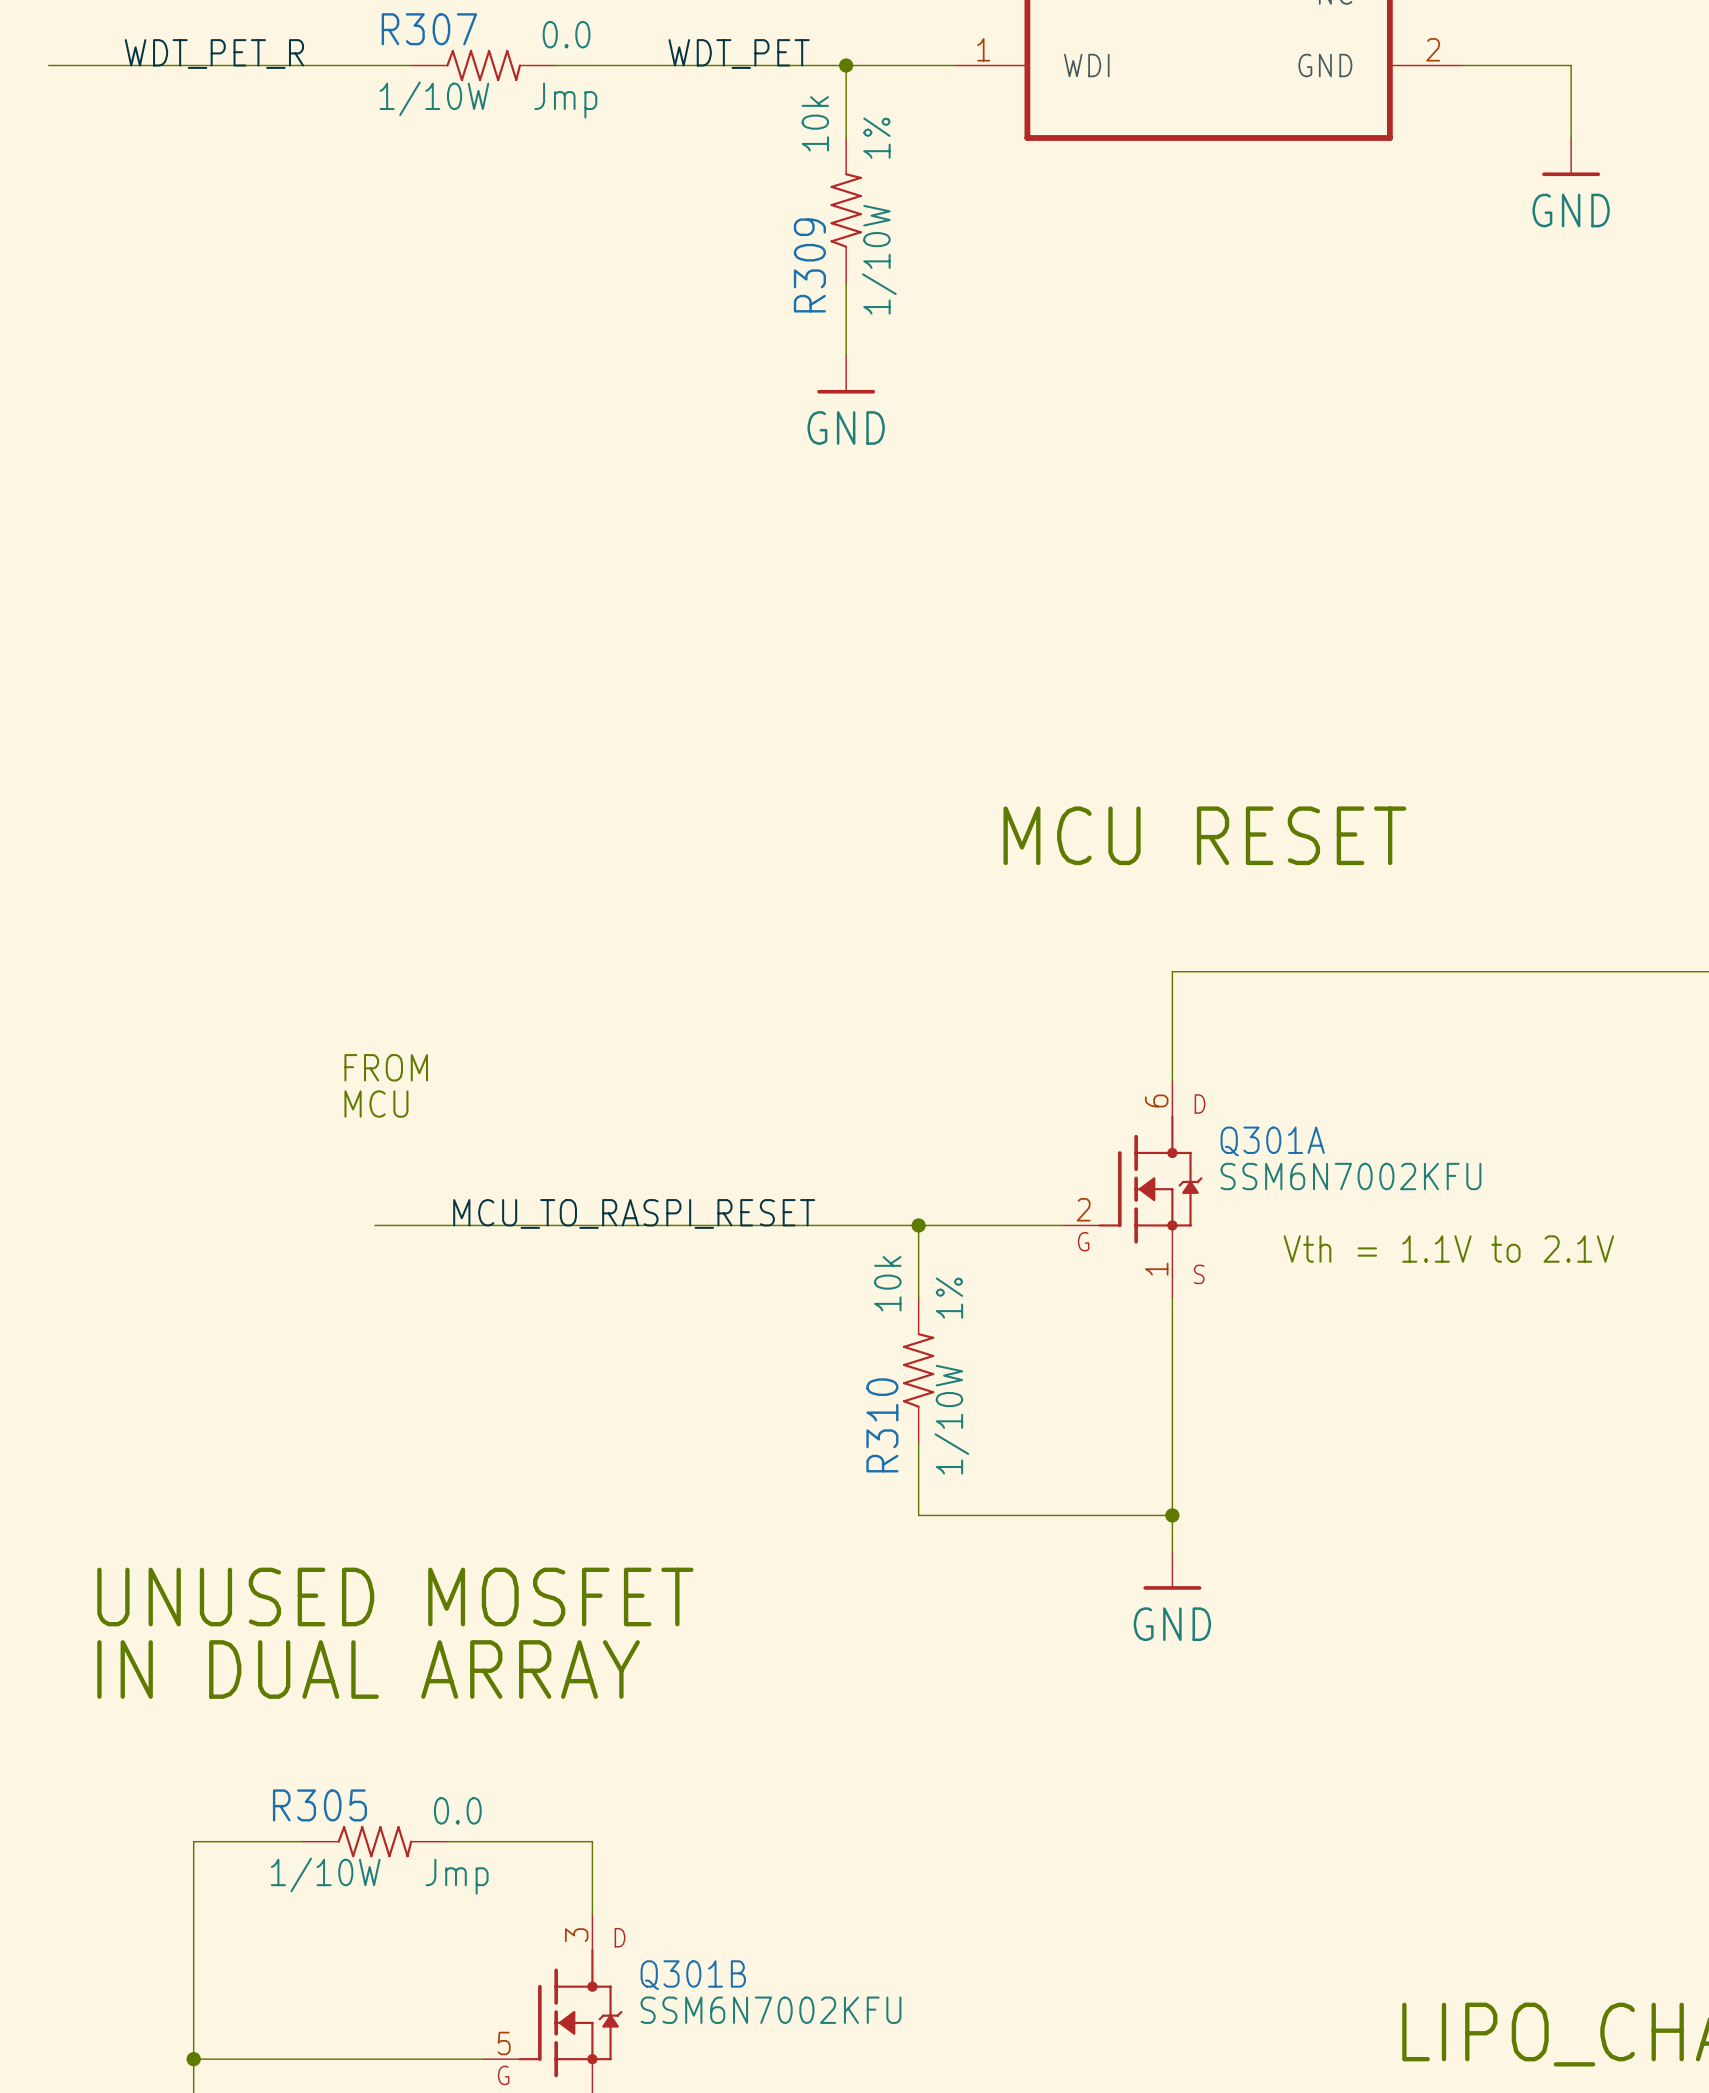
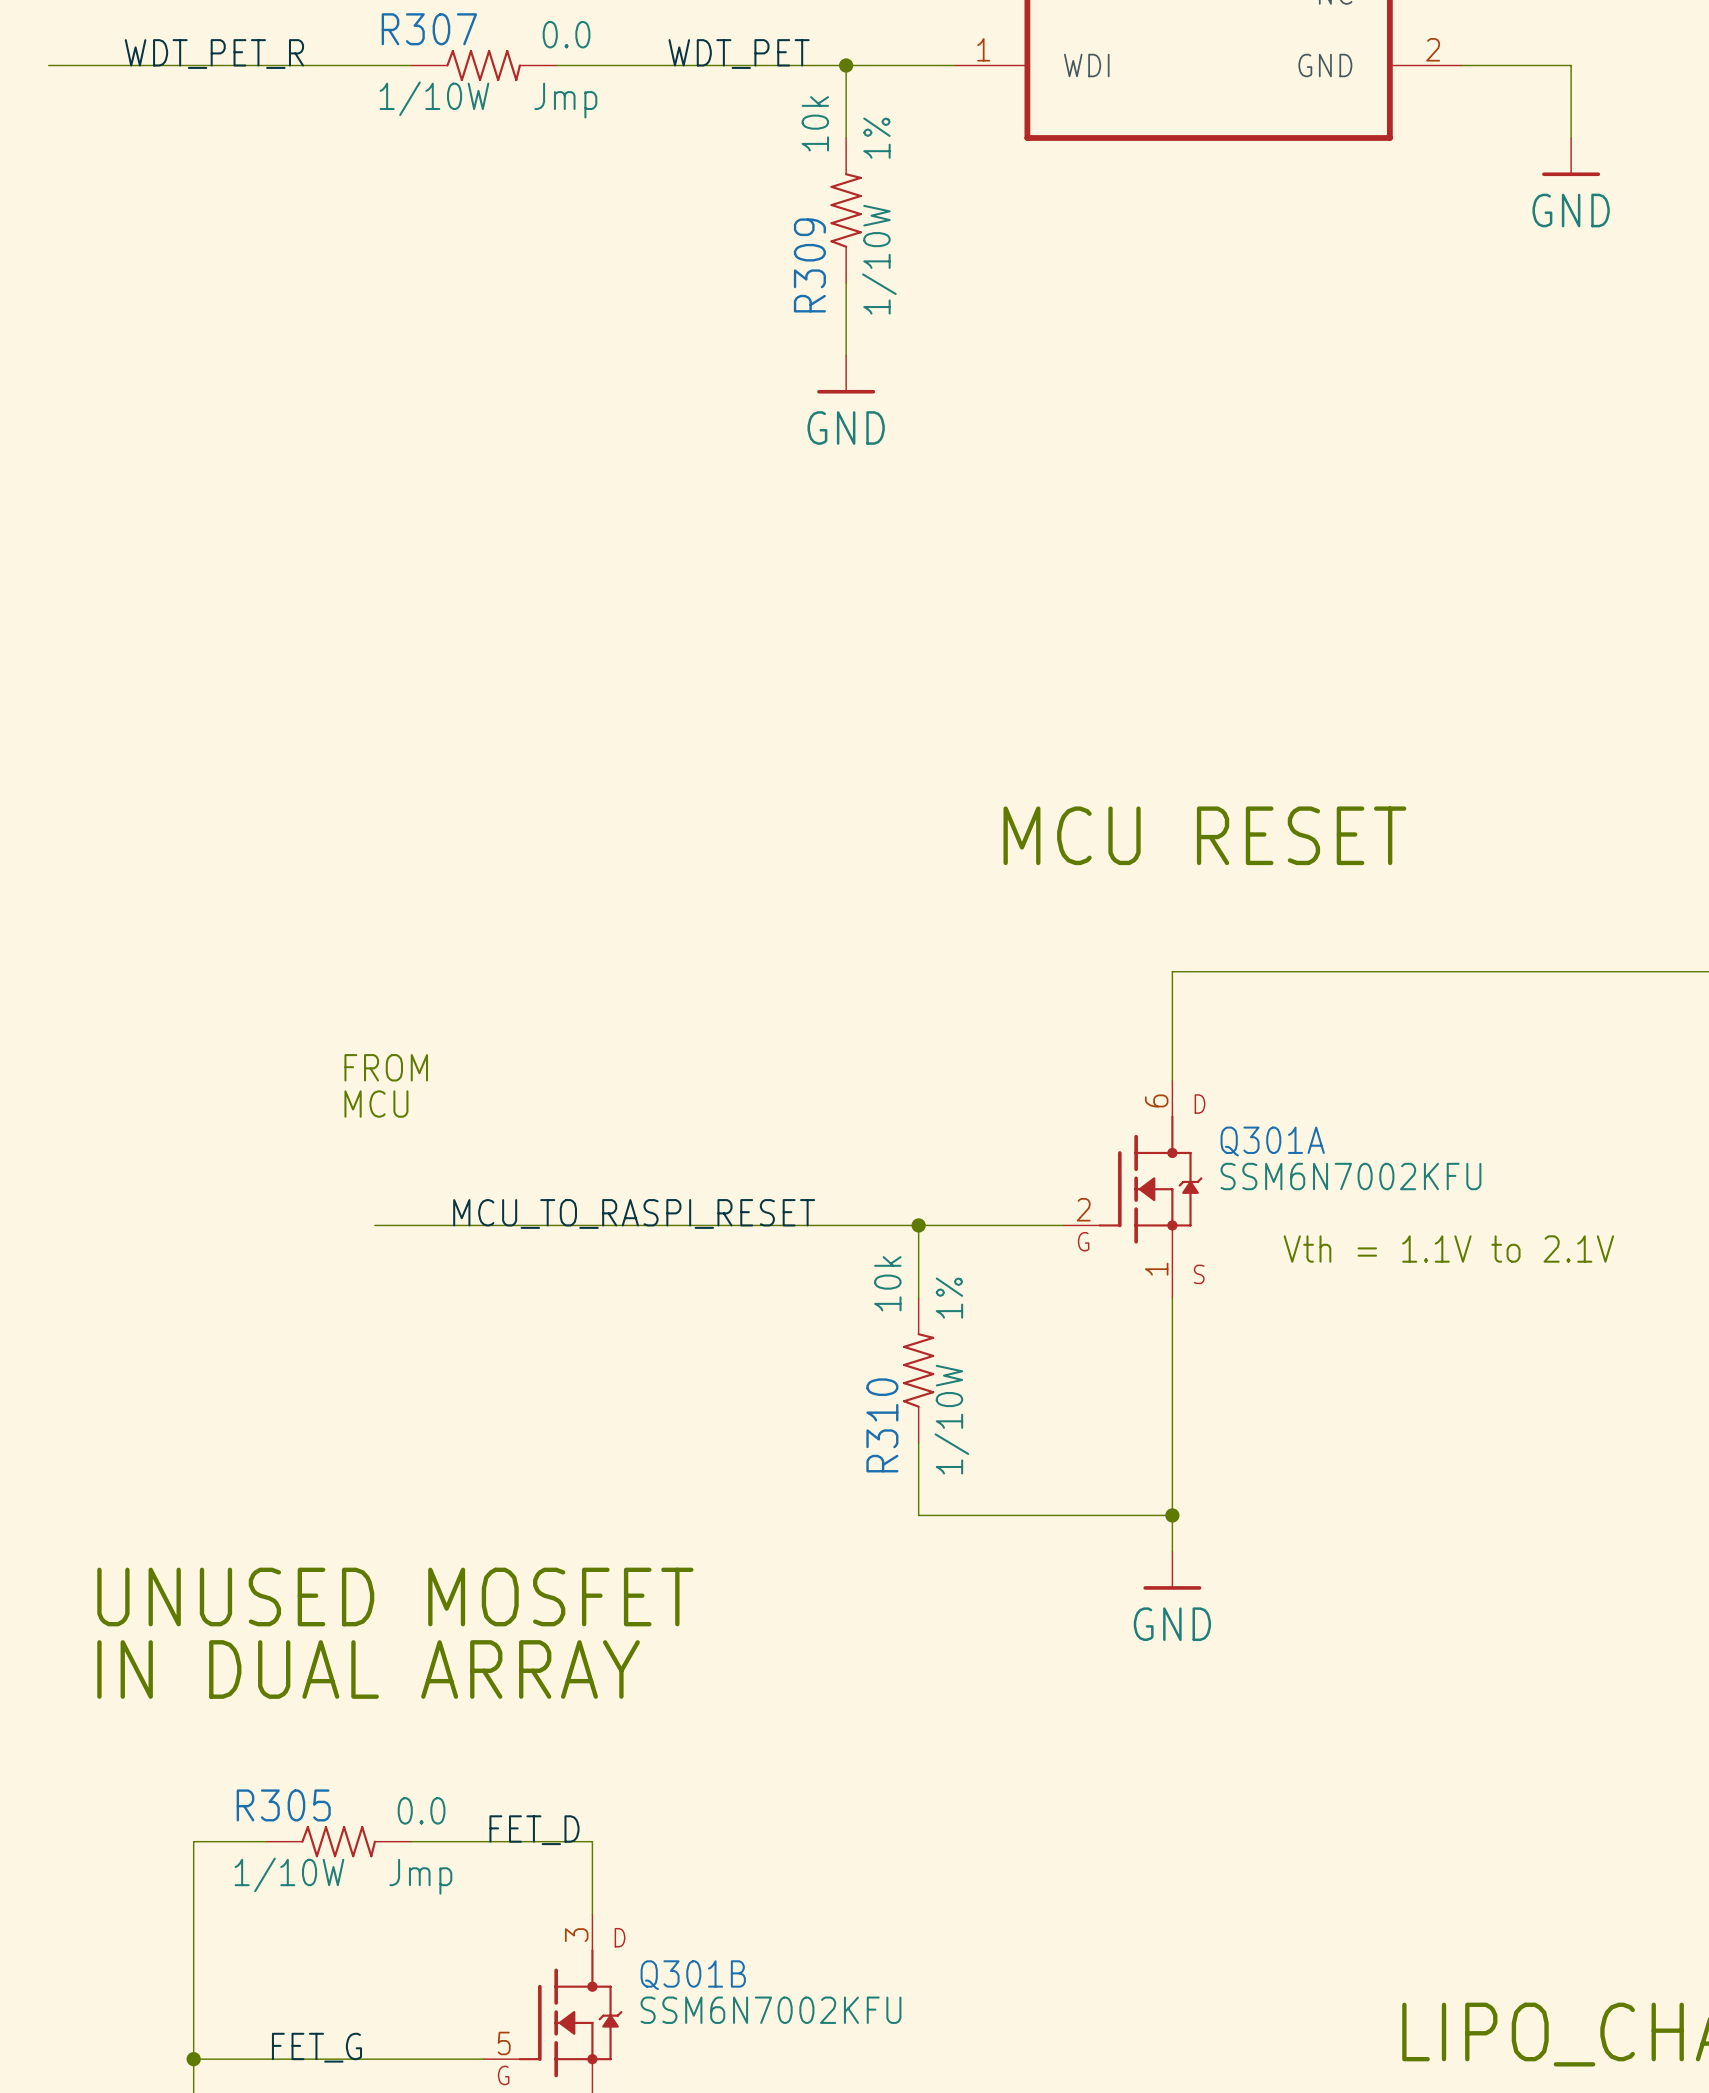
label: none -> FET_D (534, 1830)
R305 position: (374, 1841) -> (338, 1841)
label: none -> FET_G (316, 2047)

